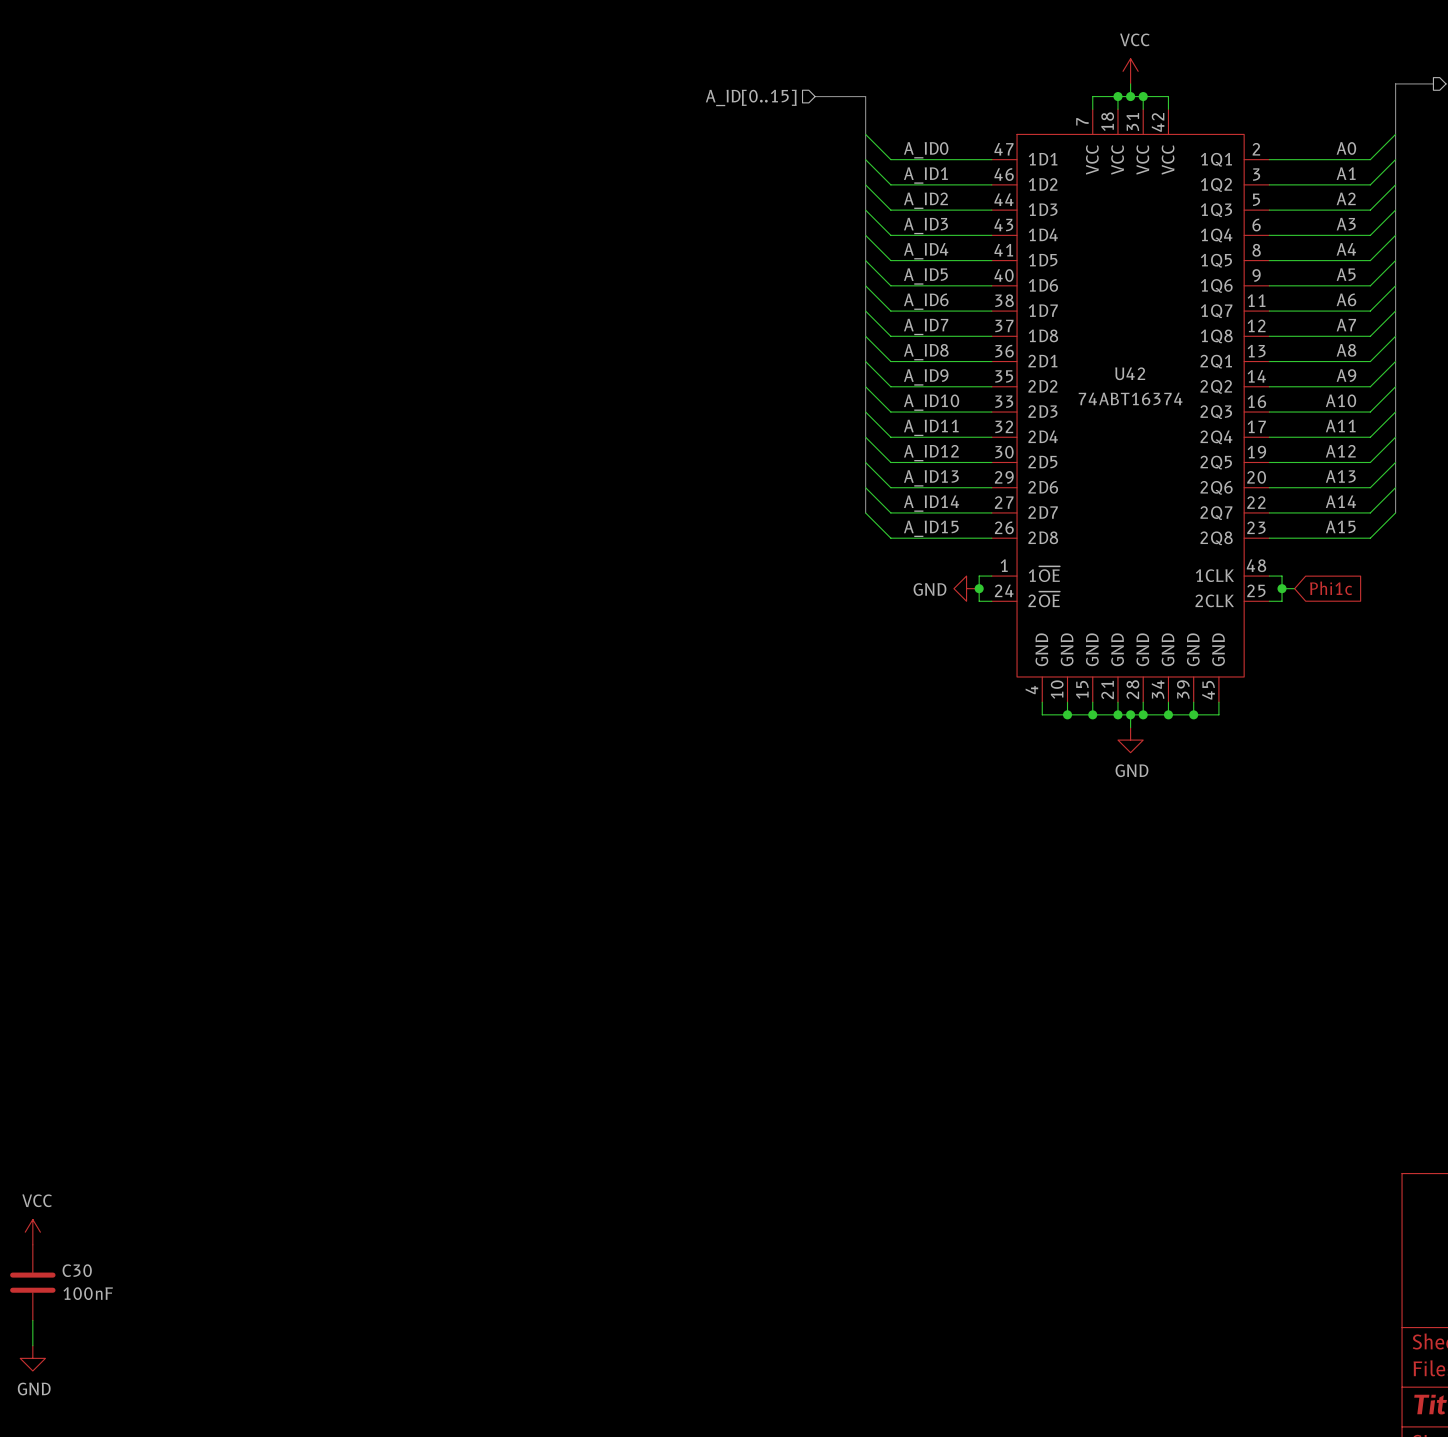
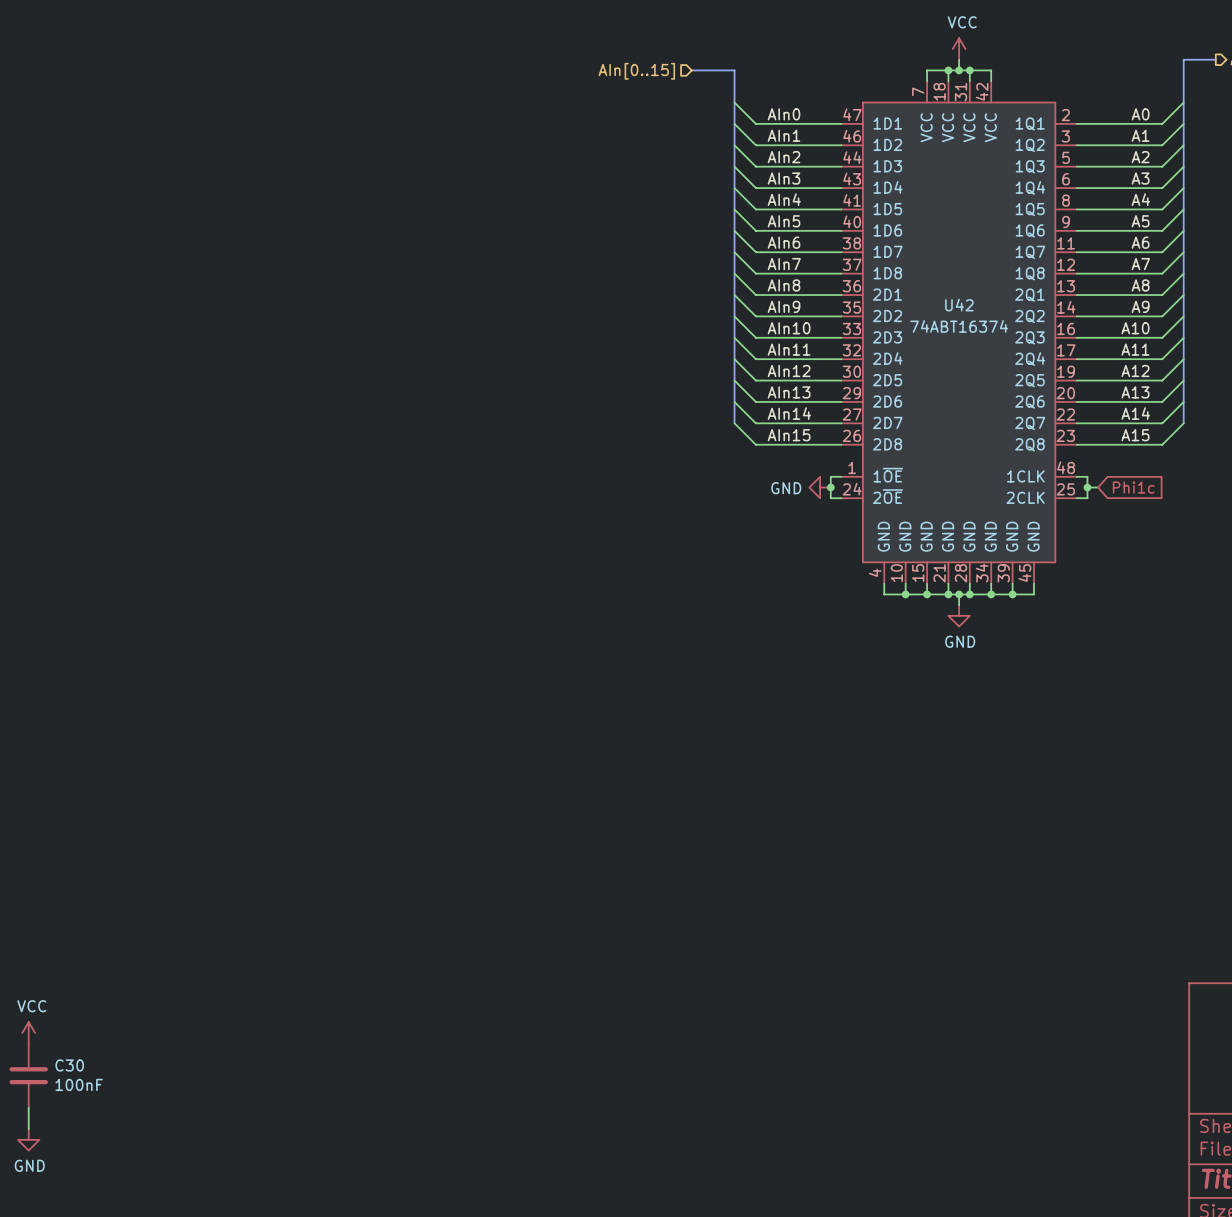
hierarchical label: A_ID[0..15] (751, 97) -> AIn[0..15] (636, 71)
label: A_ID0 (926, 150) -> AIn0 (784, 114)
label: A_ID1 (925, 175) -> AIn1 (784, 135)
label: A_ID2 (925, 200) -> AIn2 (784, 157)
label: A_ID3 (925, 225) -> AIn3 (784, 178)
label: A_ID4 (926, 251) -> AIn4 (784, 199)
label: A_ID5 (925, 276) -> AIn5 (784, 221)
label: A_ID6 (926, 301) -> AIn6 (784, 242)
label: A_ID7 (926, 326) -> AIn7 (784, 264)
label: A_ID8 (926, 352) -> AIn8 (784, 285)
label: A_ID9 (926, 377) -> AIn9 (784, 306)
label: A_ID10 (931, 402) -> AIn10 (789, 328)
label: A_ID11 (931, 427) -> AIn11 (789, 349)
label: A_ID12 (931, 453) -> AIn12 (789, 371)
label: A_ID13 (931, 478) -> AIn13 (789, 392)
label: A_ID14 (931, 503) -> AIn14 (789, 413)
label: A_ID15 (931, 528) -> AIn15 (789, 435)

